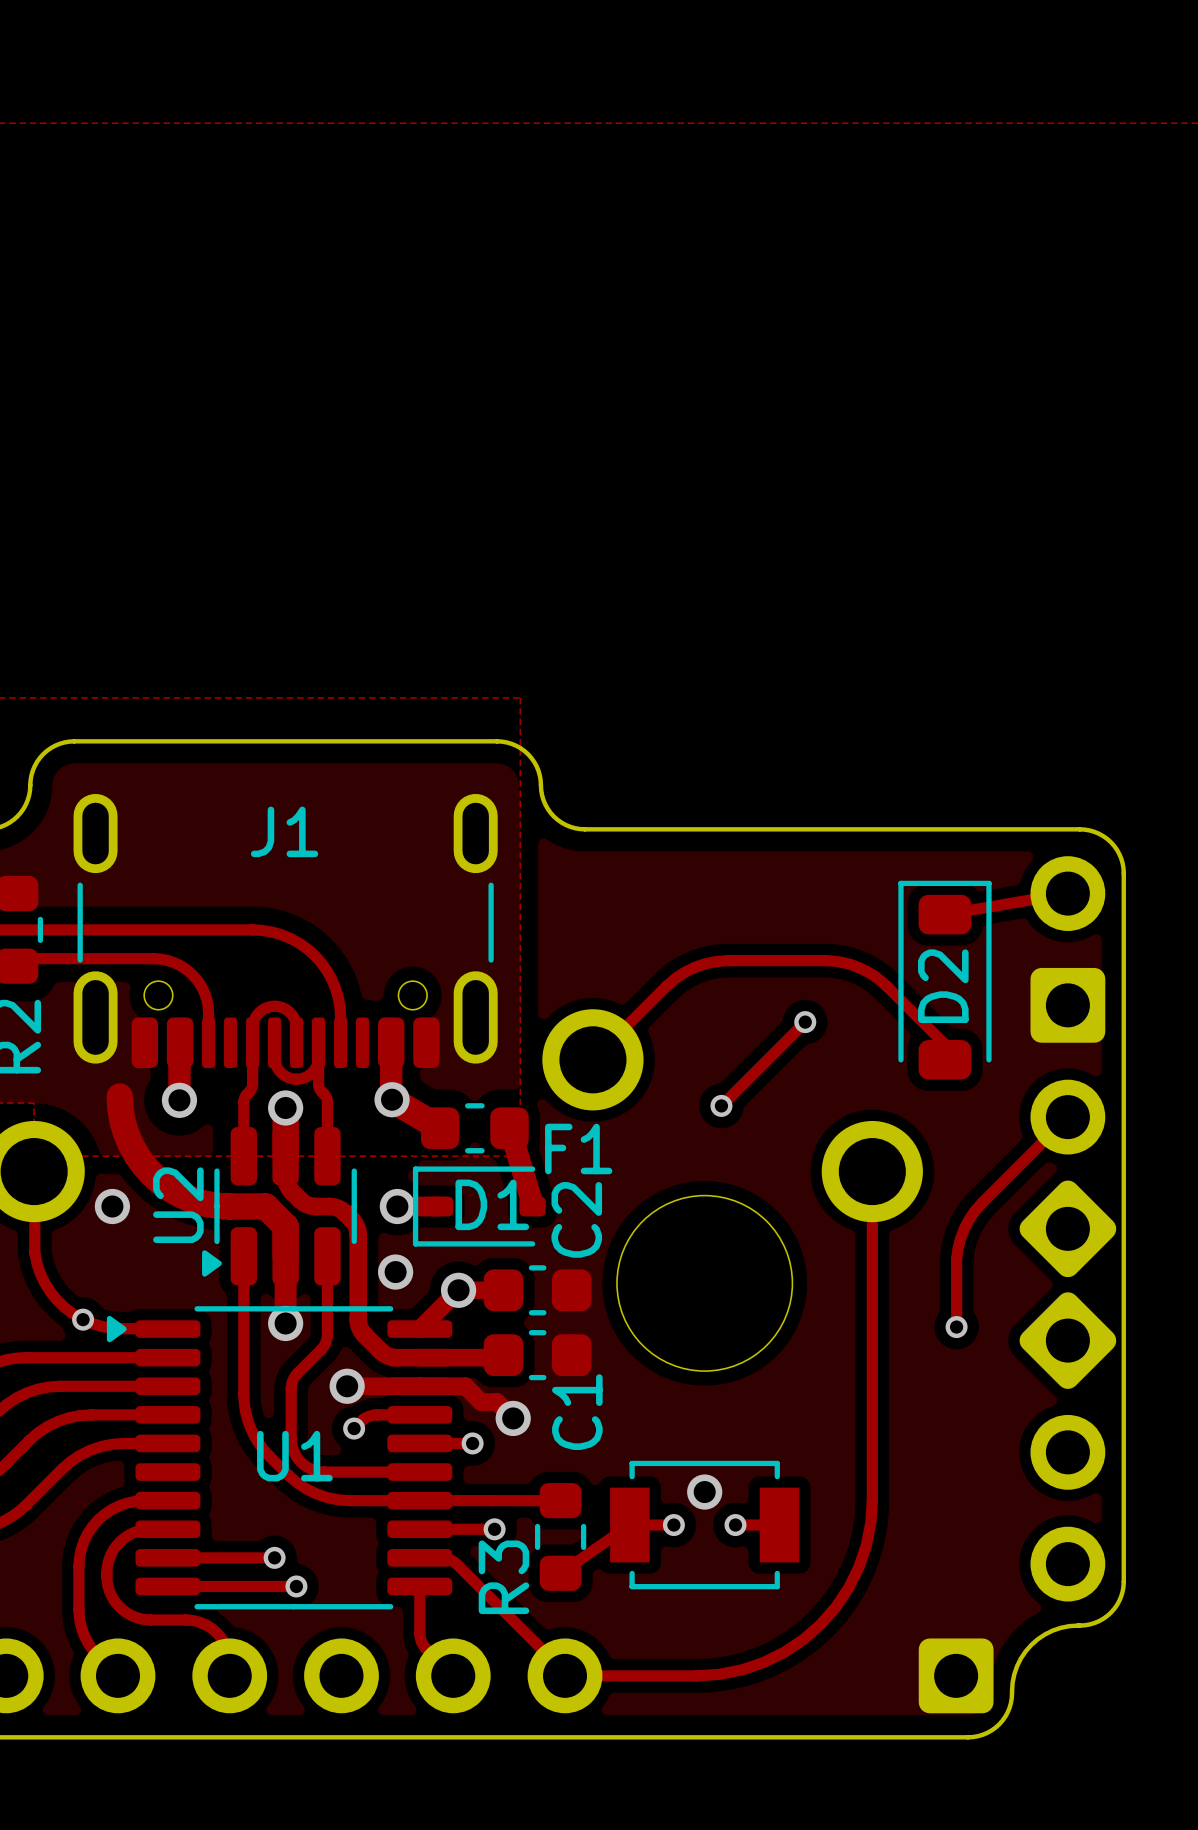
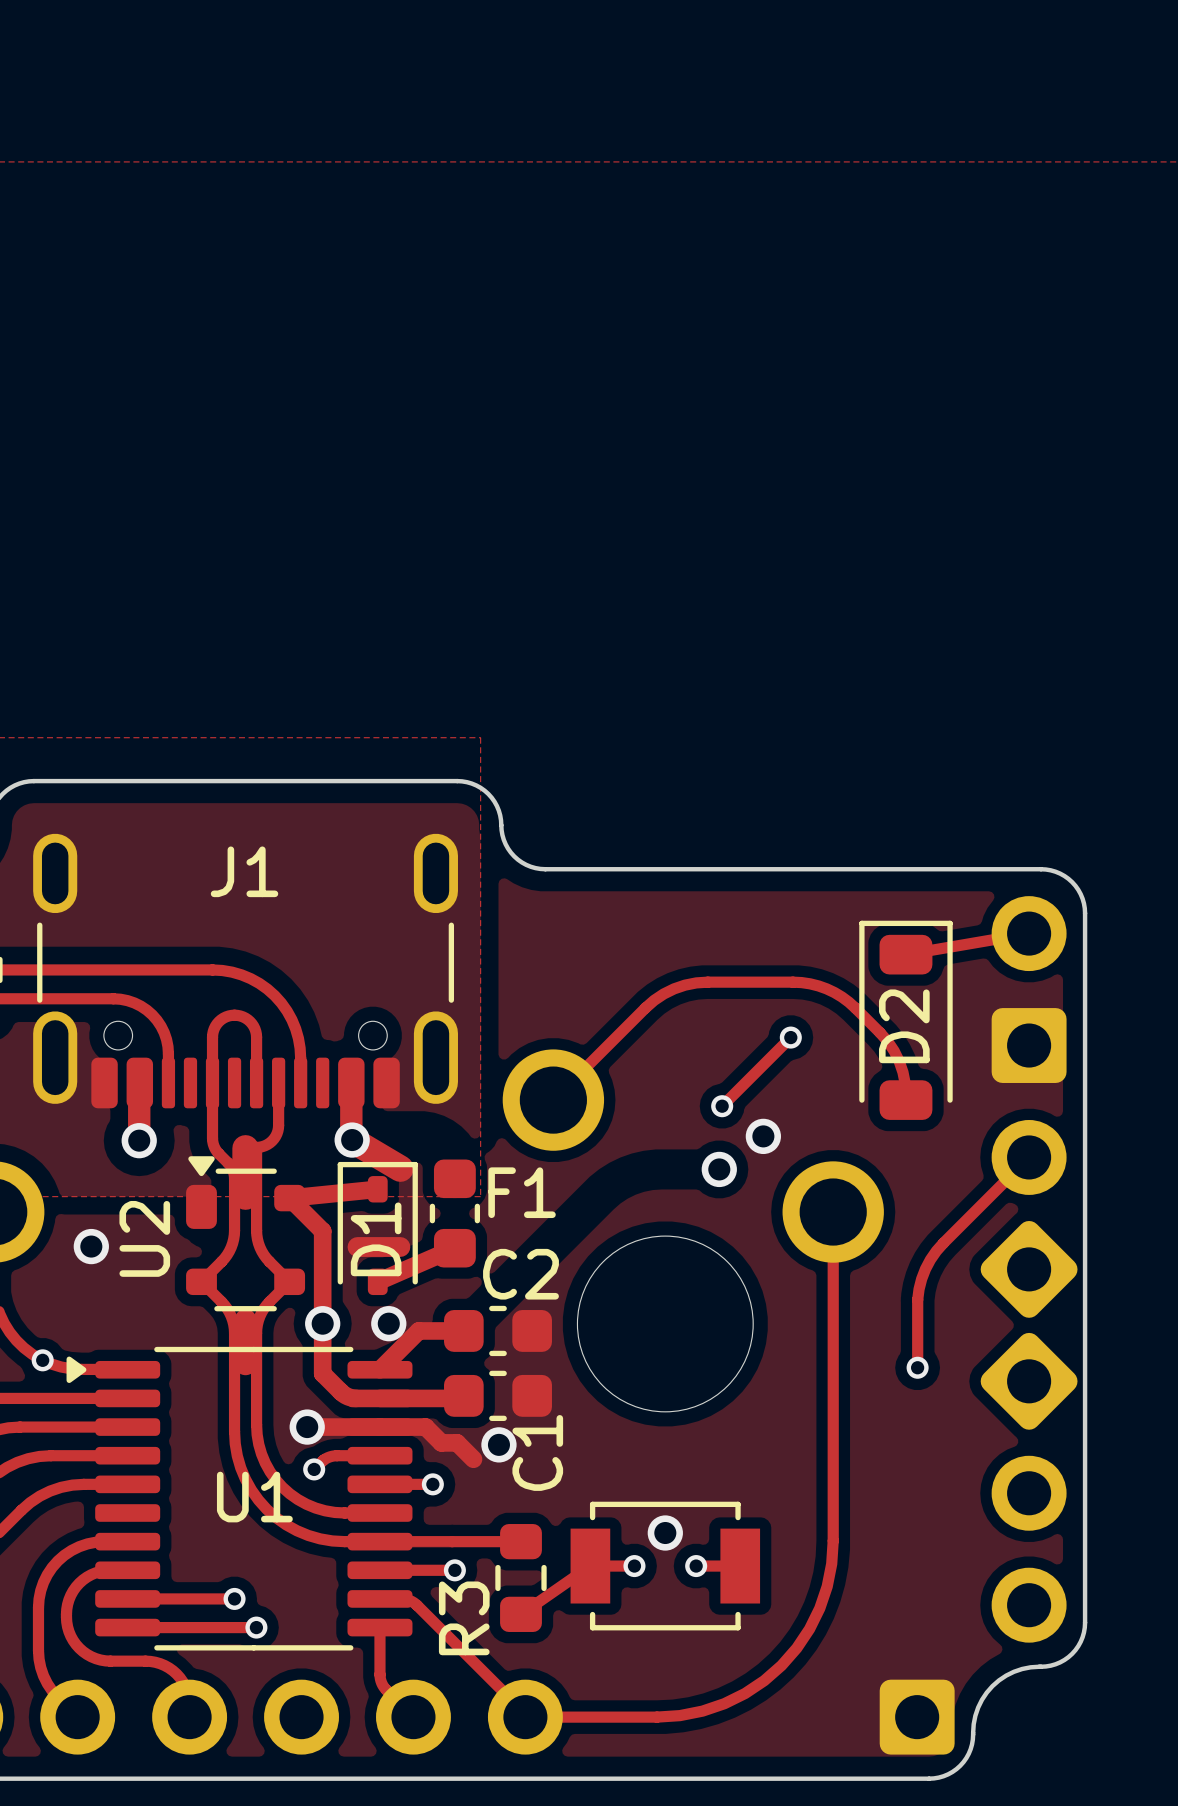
track: (666, 986) (684, 972) (694, 967) (717, 961) (824, 960) (841, 962) (858, 967) (880, 980) (944, 1044) (944, 1054) -> (626, 1026) (654, 1000) (674, 988) (685, 985) (707, 982) (810, 983) (826, 988) (848, 1002) (887, 1041) (899, 1061) (902, 1072) (905, 1095)
track: none -> (790, 1037) (766, 1062)
via: none -> (790, 1037)
via: (805, 1022) -> none
track: (252, 1028) (254, 1019) (259, 1012) (266, 1007) (274, 1006) (283, 1007) (290, 1012) (294, 1019) (296, 1028) -> none
track: none -> (212, 1082) (213, 1031) (221, 1019) (234, 1015) (247, 1019) (255, 1031) (256, 1082)
track: (274, 1057) (276, 1065) (281, 1072) (288, 1077) (296, 1079) (305, 1077) (312, 1072) (316, 1065) (318, 1057) -> none
track: (761, 1065) (721, 1105) -> none
via: none -> (722, 1106)
track: (252, 1084) (243, 1100) (243, 1156) -> (212, 1124) (214, 1146) (230, 1166) (234, 1174) (234, 1234) (227, 1254) (201, 1281)
track: (318, 1084) (327, 1100) (327, 1156) -> (278, 1124) (276, 1133) (272, 1140) (265, 1145) (256, 1147) (256, 1234) (264, 1254) (289, 1281)
track: (119, 1096) (125, 1132) (136, 1155) (151, 1174) (171, 1189) (205, 1203) (229, 1206) (265, 1206) (285, 1226) (285, 1256) -> none
via: none -> (763, 1136)
via: (721, 1105) -> none
via: (285, 1107) -> none
U2 footprint: [202, 1127, 357, 1286] -> [186, 1156, 306, 1312]
F1 rotation: 0° (474, 1128) -> 90° clockwise (454, 1213)
track: (509, 1128) (532, 1203) -> none
via: none -> (719, 1169)
track: (285, 1176) (289, 1188) (302, 1201) (313, 1206) (337, 1208) (355, 1224) (358, 1235) (358, 1321) (364, 1335) -> (377, 1189) (289, 1198) (322, 1231) (322, 1373) (324, 1375)
via position: (112, 1206) -> (91, 1246)
via: (397, 1206) -> none
D1 rotation: 0° (479, 1206) -> 90° clockwise (377, 1228)
track: none -> (454, 1248) (377, 1281)
C2 name rotation: 0° (576, 1219) -> 90° clockwise (520, 1274)
track: (243, 1256) (244, 1402) (247, 1419) (254, 1435) (269, 1456) (288, 1474) (306, 1488) (316, 1493) (338, 1499) (384, 1500) -> (201, 1281) (224, 1305) (233, 1324) (235, 1443) (245, 1479) (266, 1509) (286, 1524) (320, 1538) (344, 1541)
track: (327, 1256) (327, 1338) (322, 1348) (295, 1375) (291, 1383) (292, 1447) (301, 1462) (315, 1470) (384, 1472) -> (289, 1281) (266, 1305) (257, 1324) (256, 1424) (258, 1444) (270, 1471) (289, 1493) (315, 1508) (344, 1513)
via: (395, 1272) -> none
via: none -> (322, 1323)
via: none -> (388, 1323)
via: (458, 1290) -> none
via: (285, 1323) -> none
via position: (513, 1418) -> (498, 1444)

